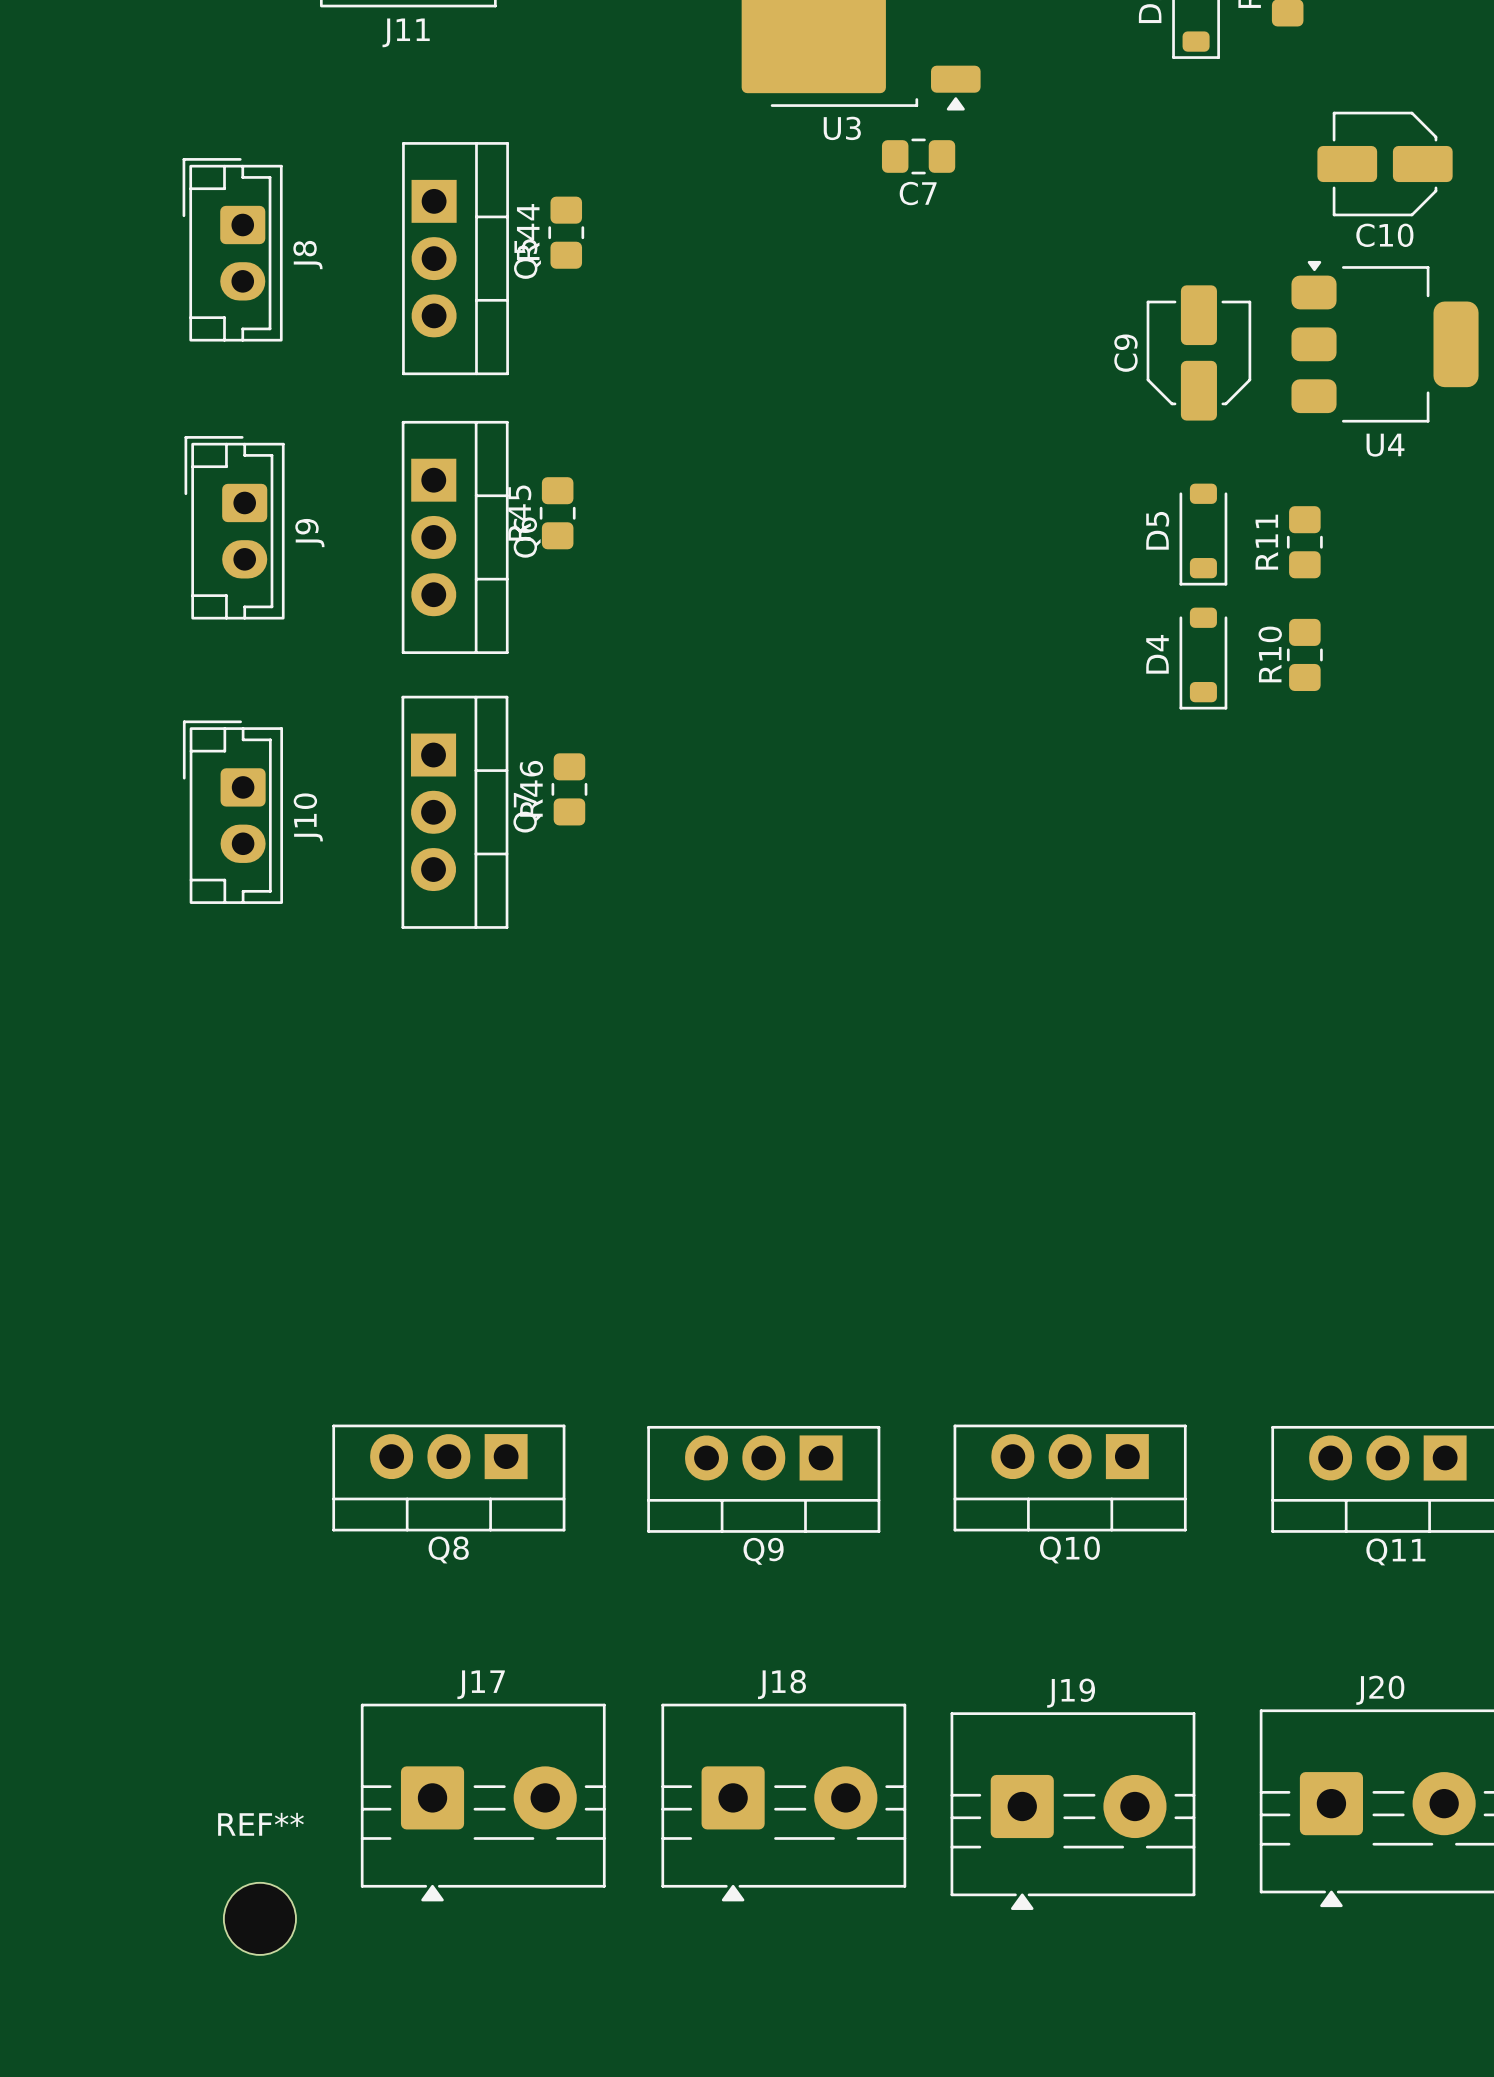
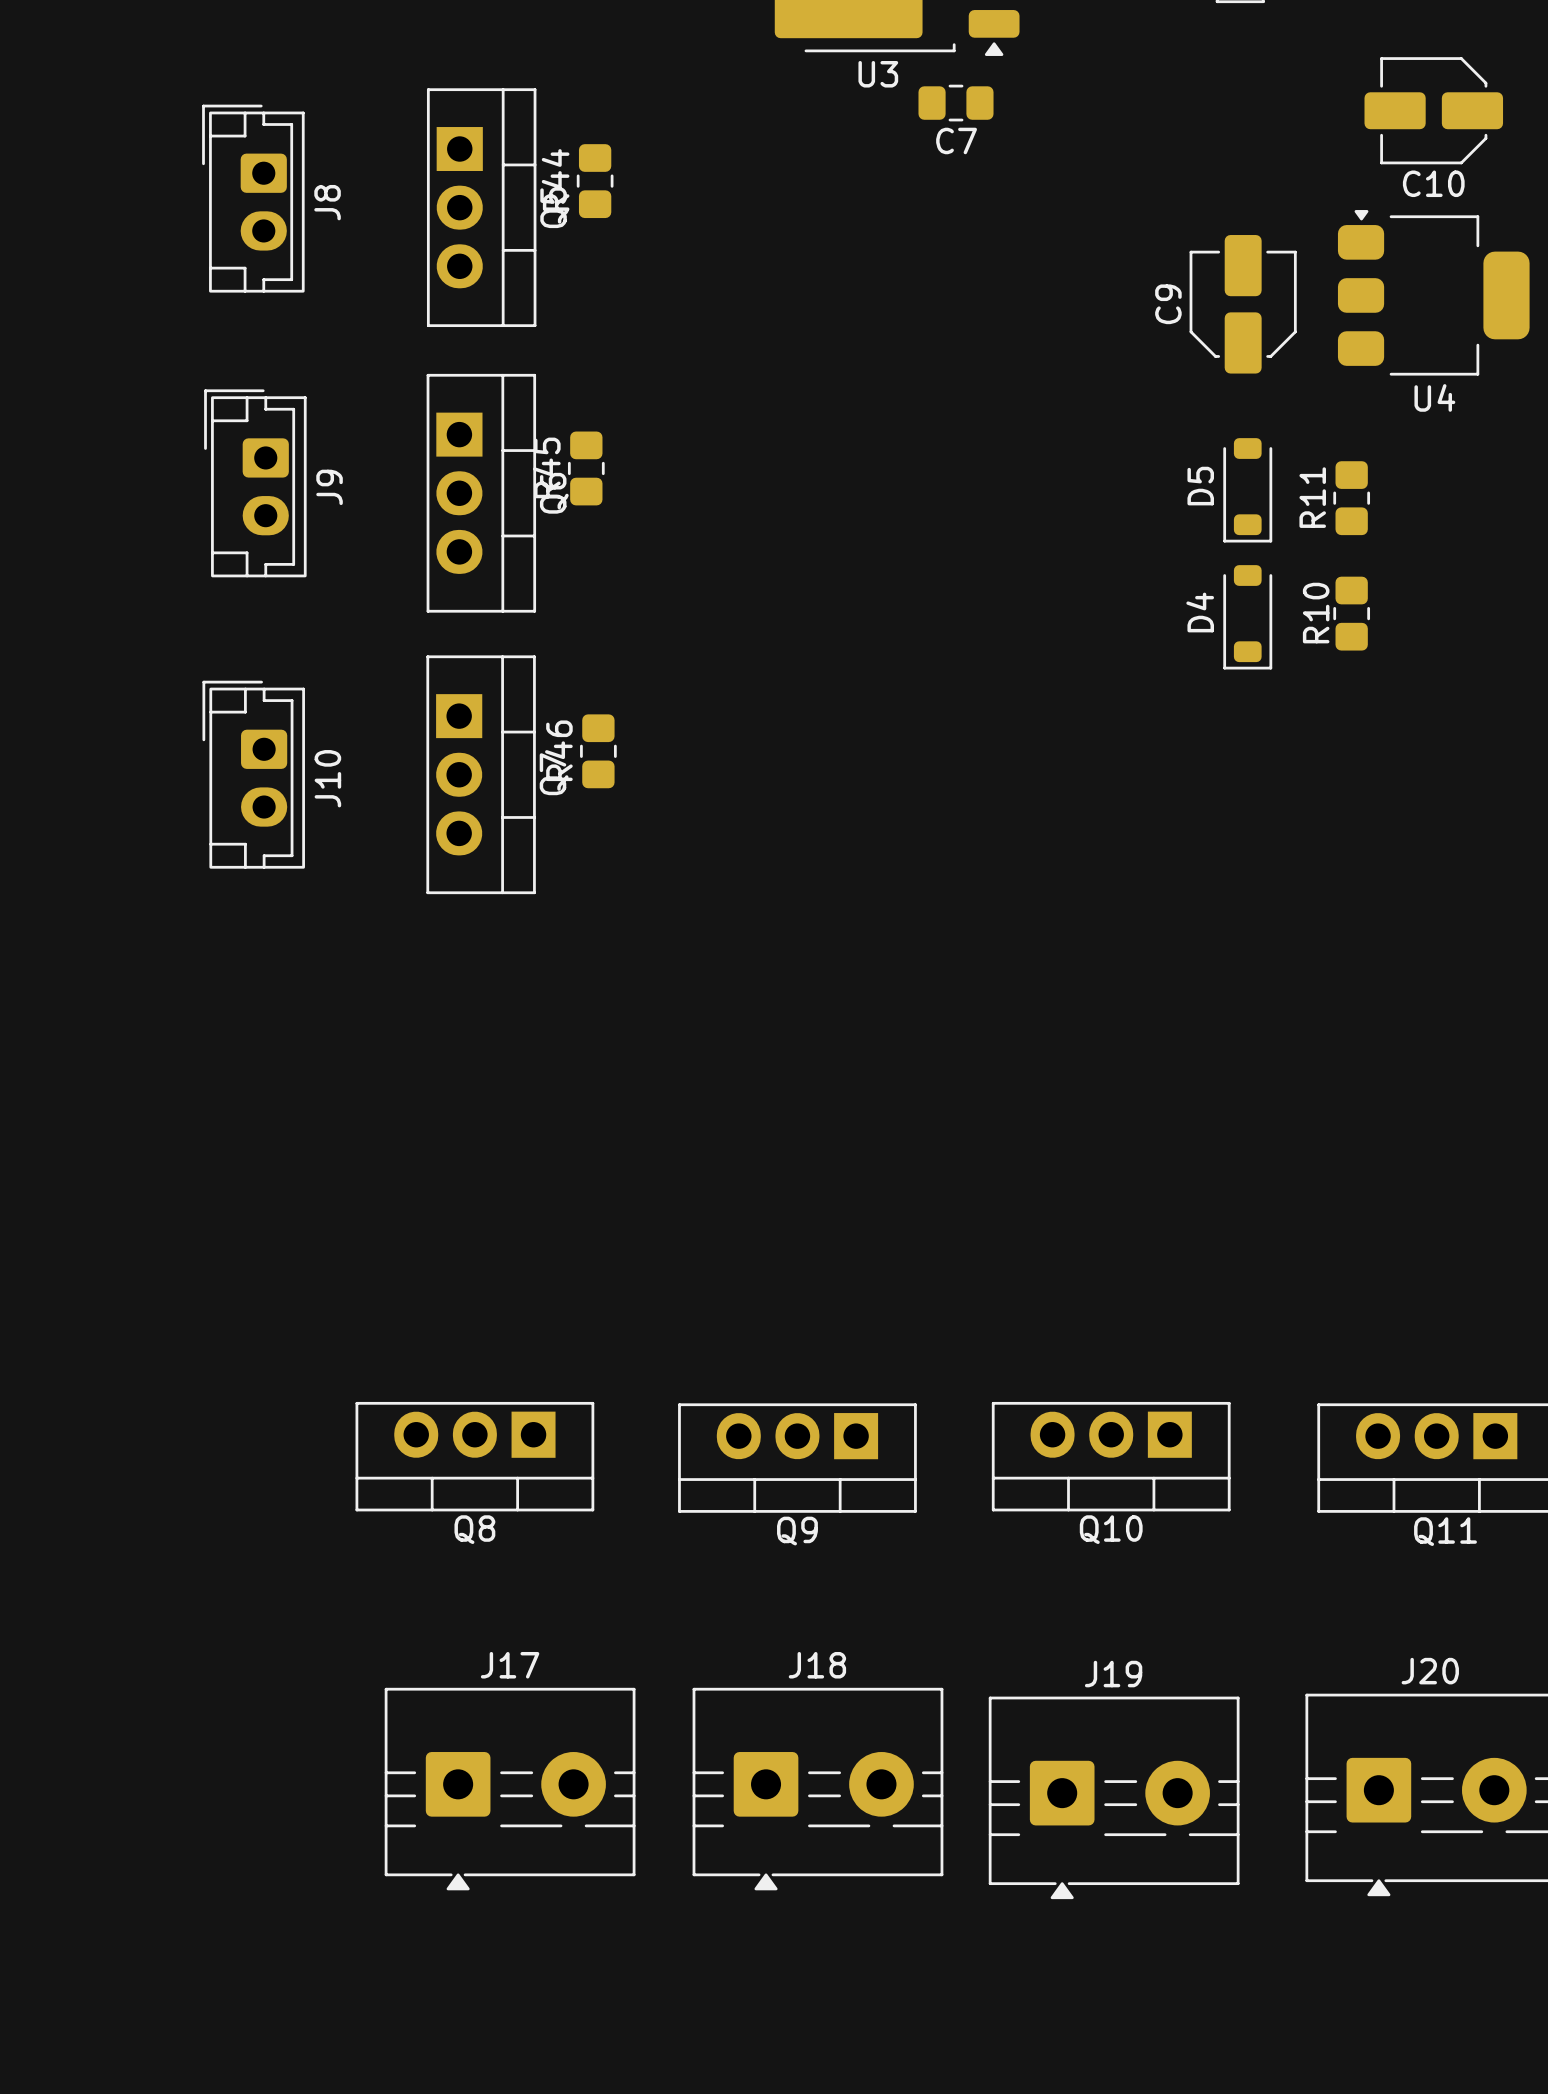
REF**: (259, 1918) -> none

